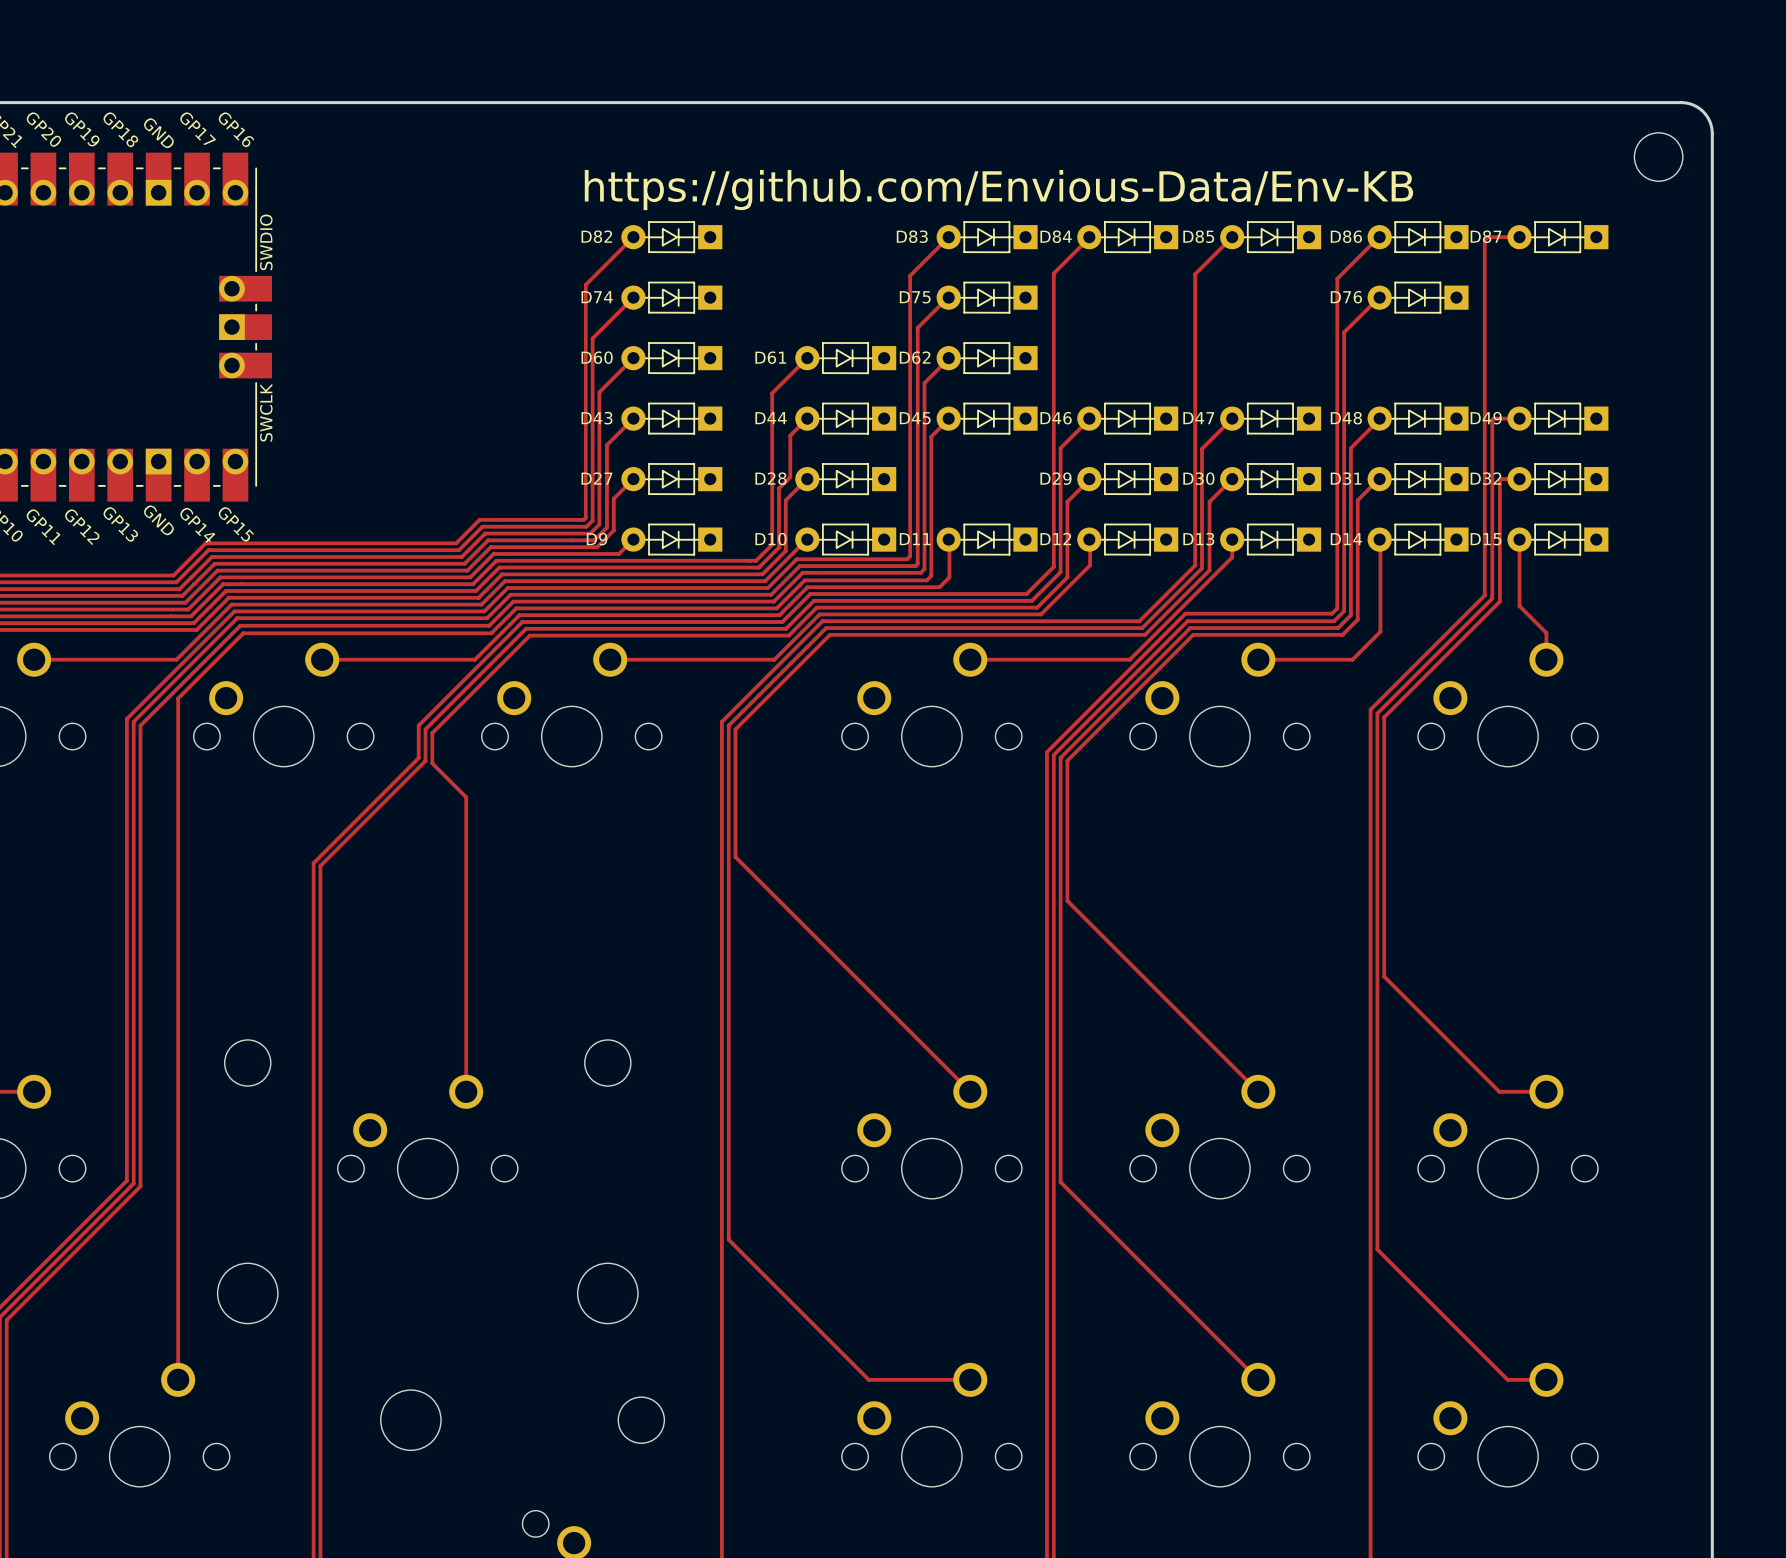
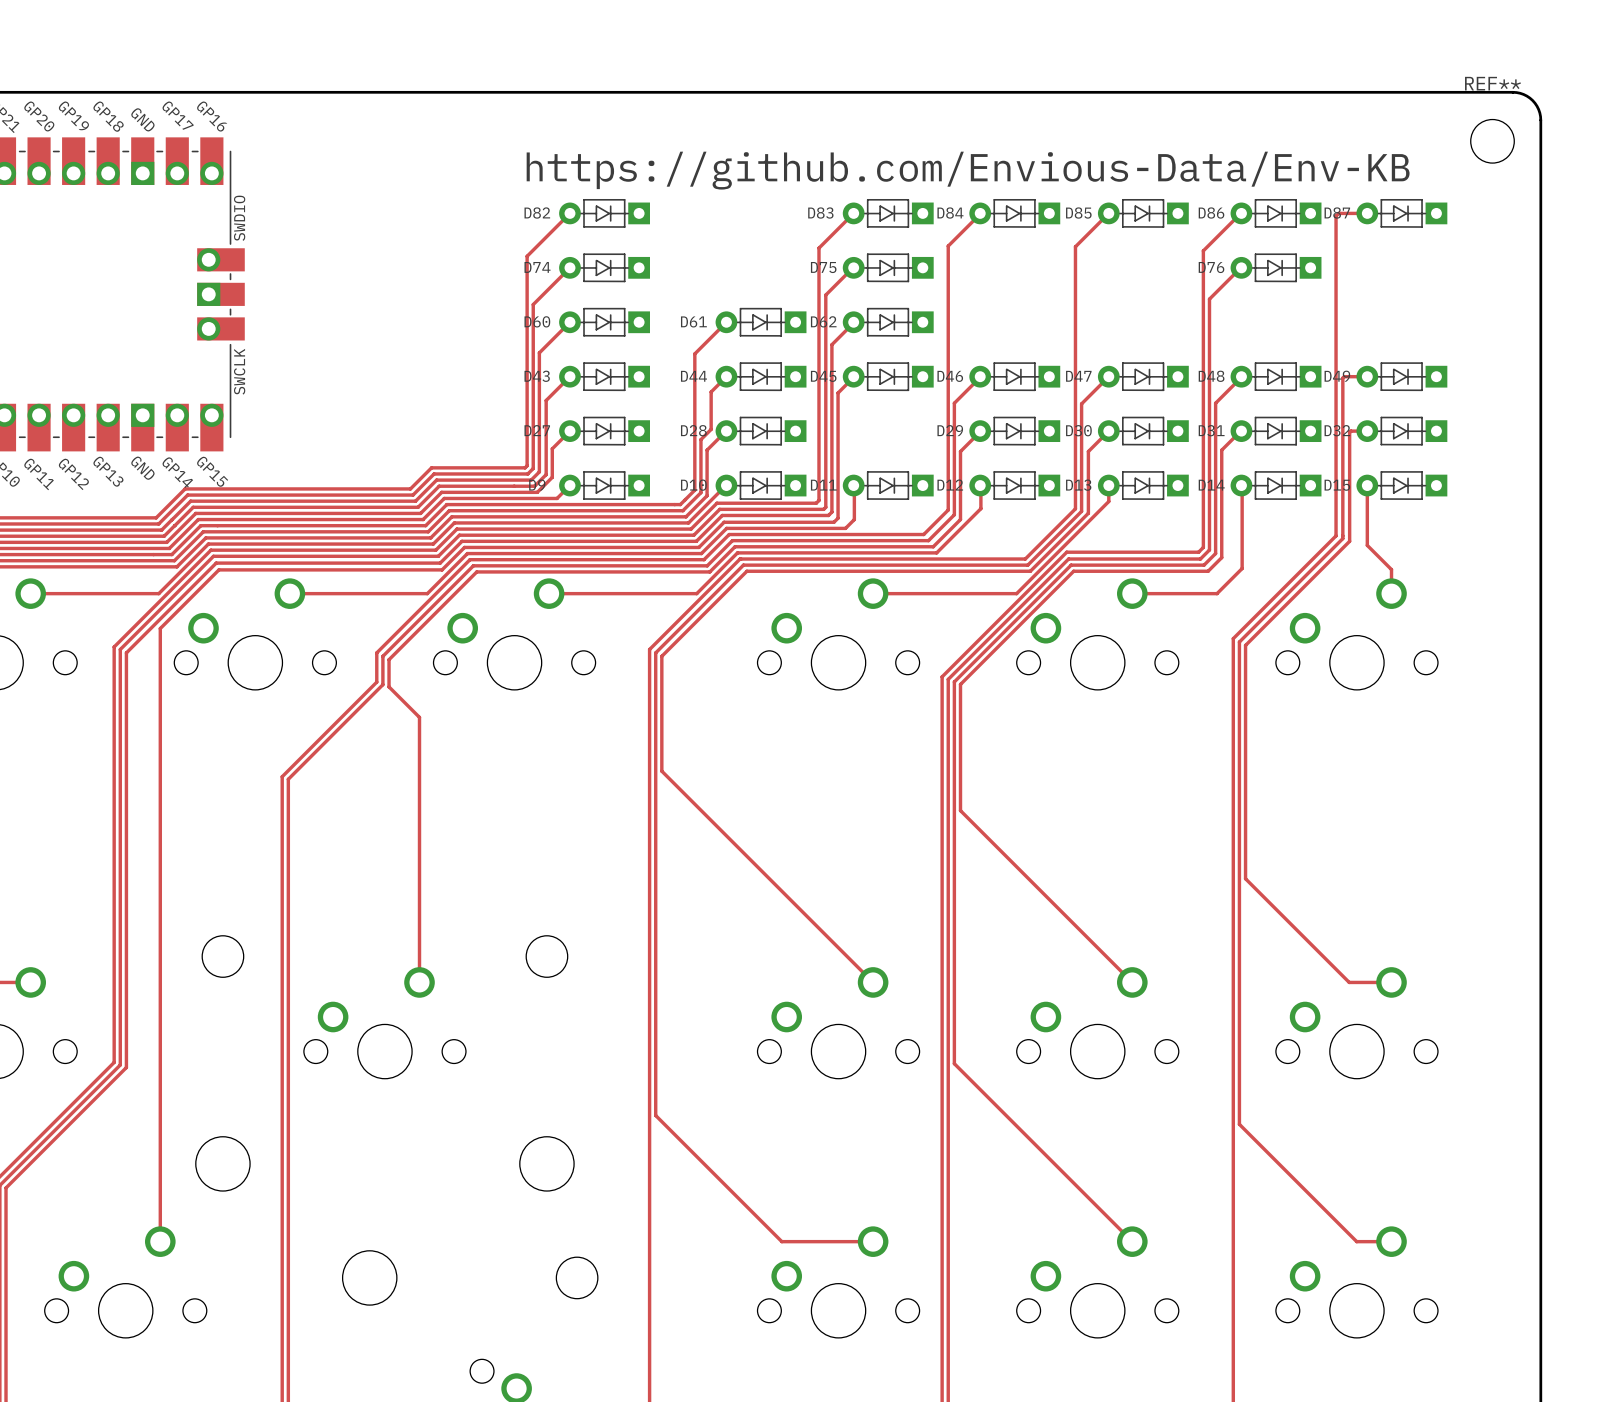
REF** name: none -> REF** (1492, 83)

